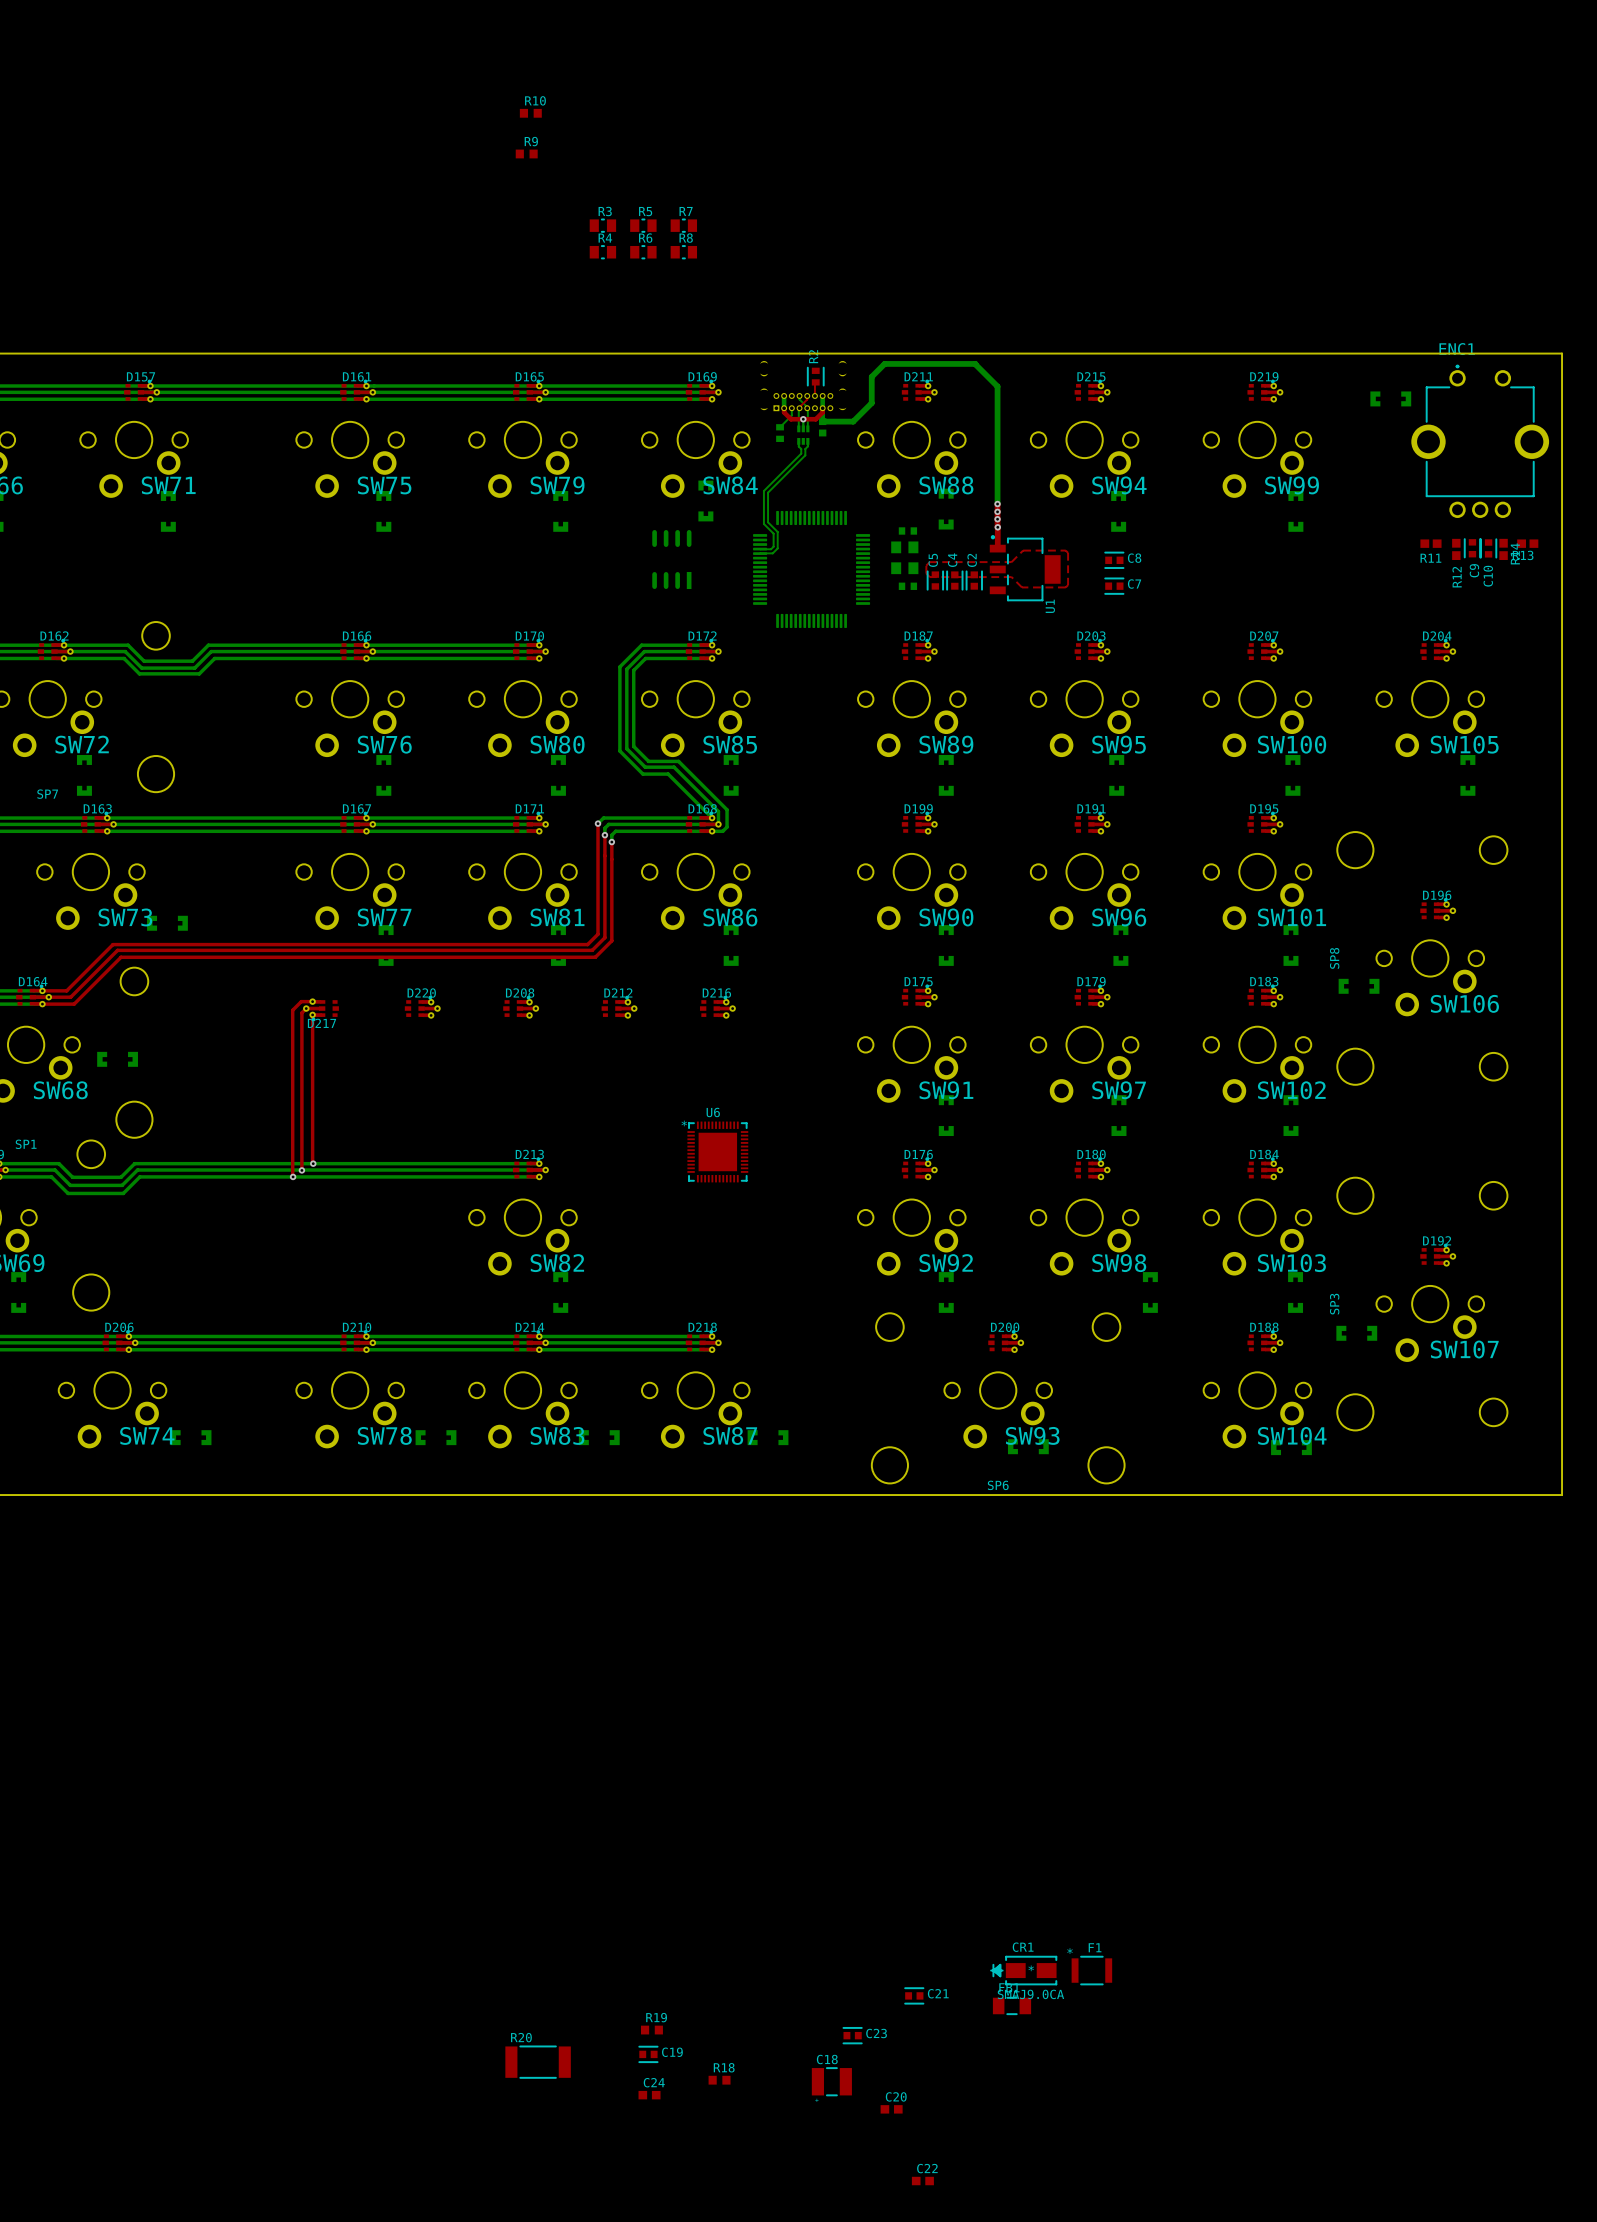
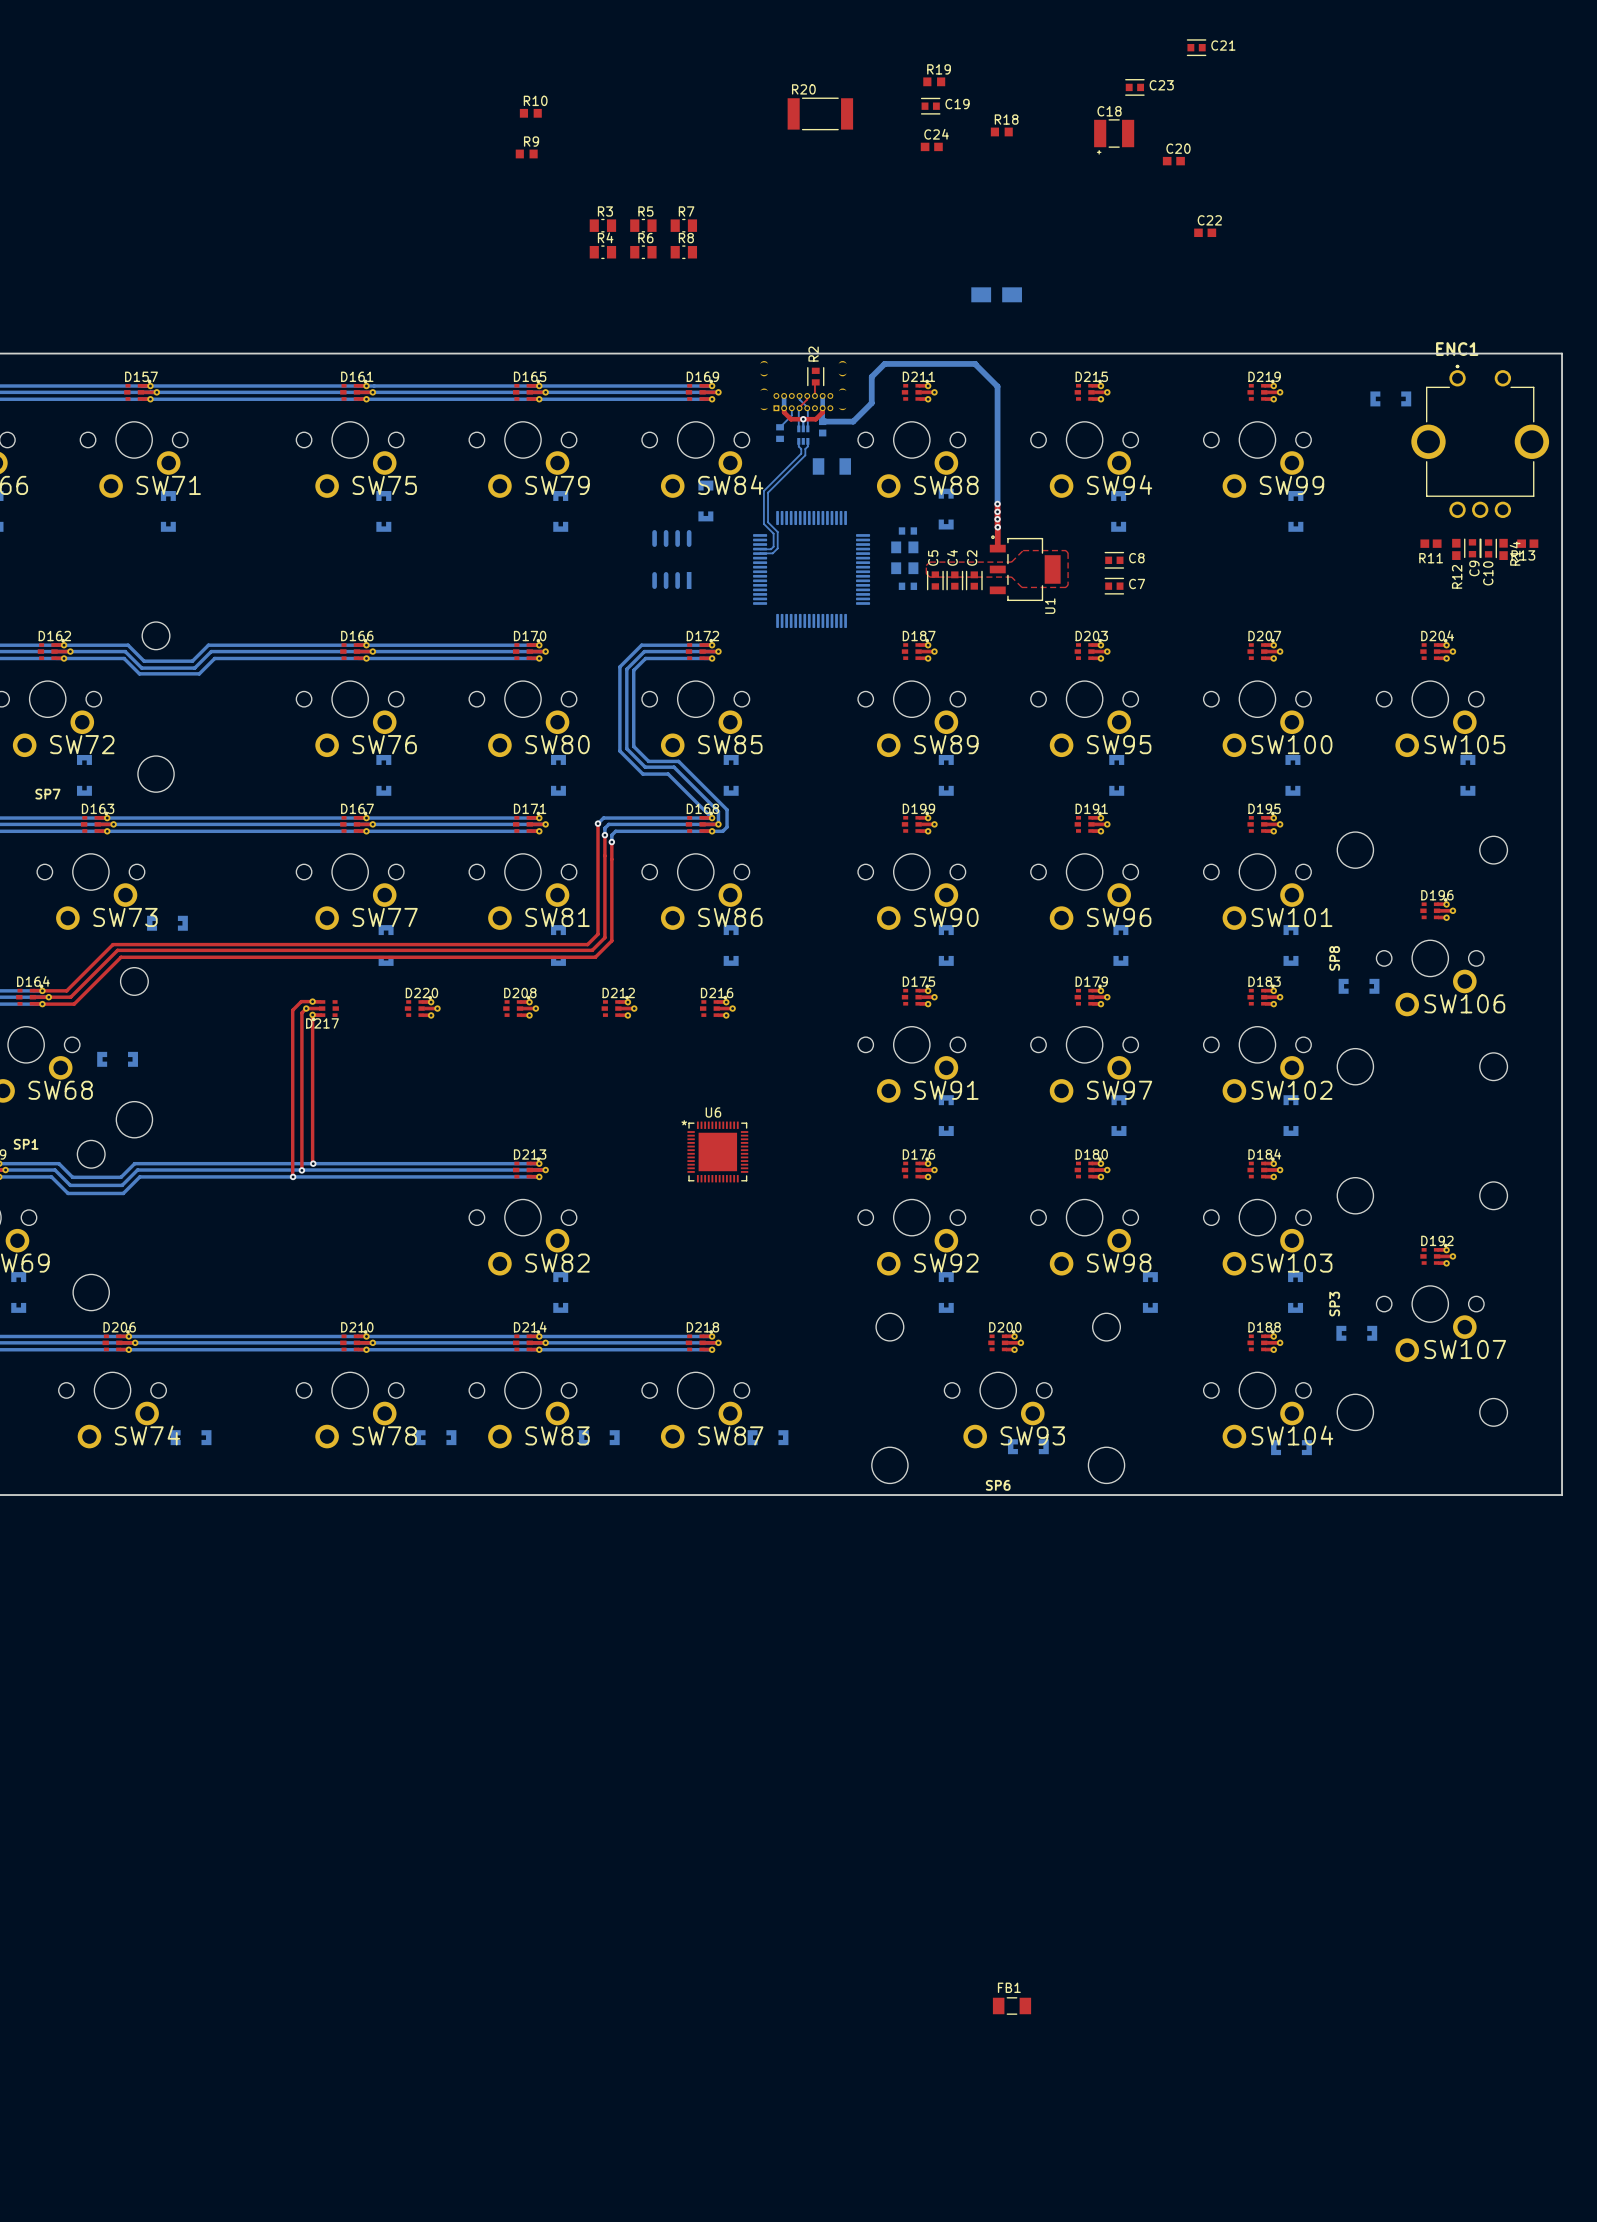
part: none -> (996, 294)
part: none -> (831, 466)
CR1: SMAJ9.0CA (1023, 1970) -> none
F1: (1091, 1970) -> none
C21 position: (914, 1995) -> (1196, 47)
R19 position: (651, 2030) -> (934, 81)
C23 position: (852, 2035) -> (1134, 87)
C19 position: (648, 2054) -> (930, 106)
R20 position: (538, 2062) -> (820, 113)
R18 position: (719, 2080) -> (1001, 131)
C18 position: (831, 2081) -> (1114, 133)
C24 position: (649, 2095) -> (931, 146)
C20 position: (891, 2109) -> (1173, 161)
C22 position: (922, 2181) -> (1205, 232)

